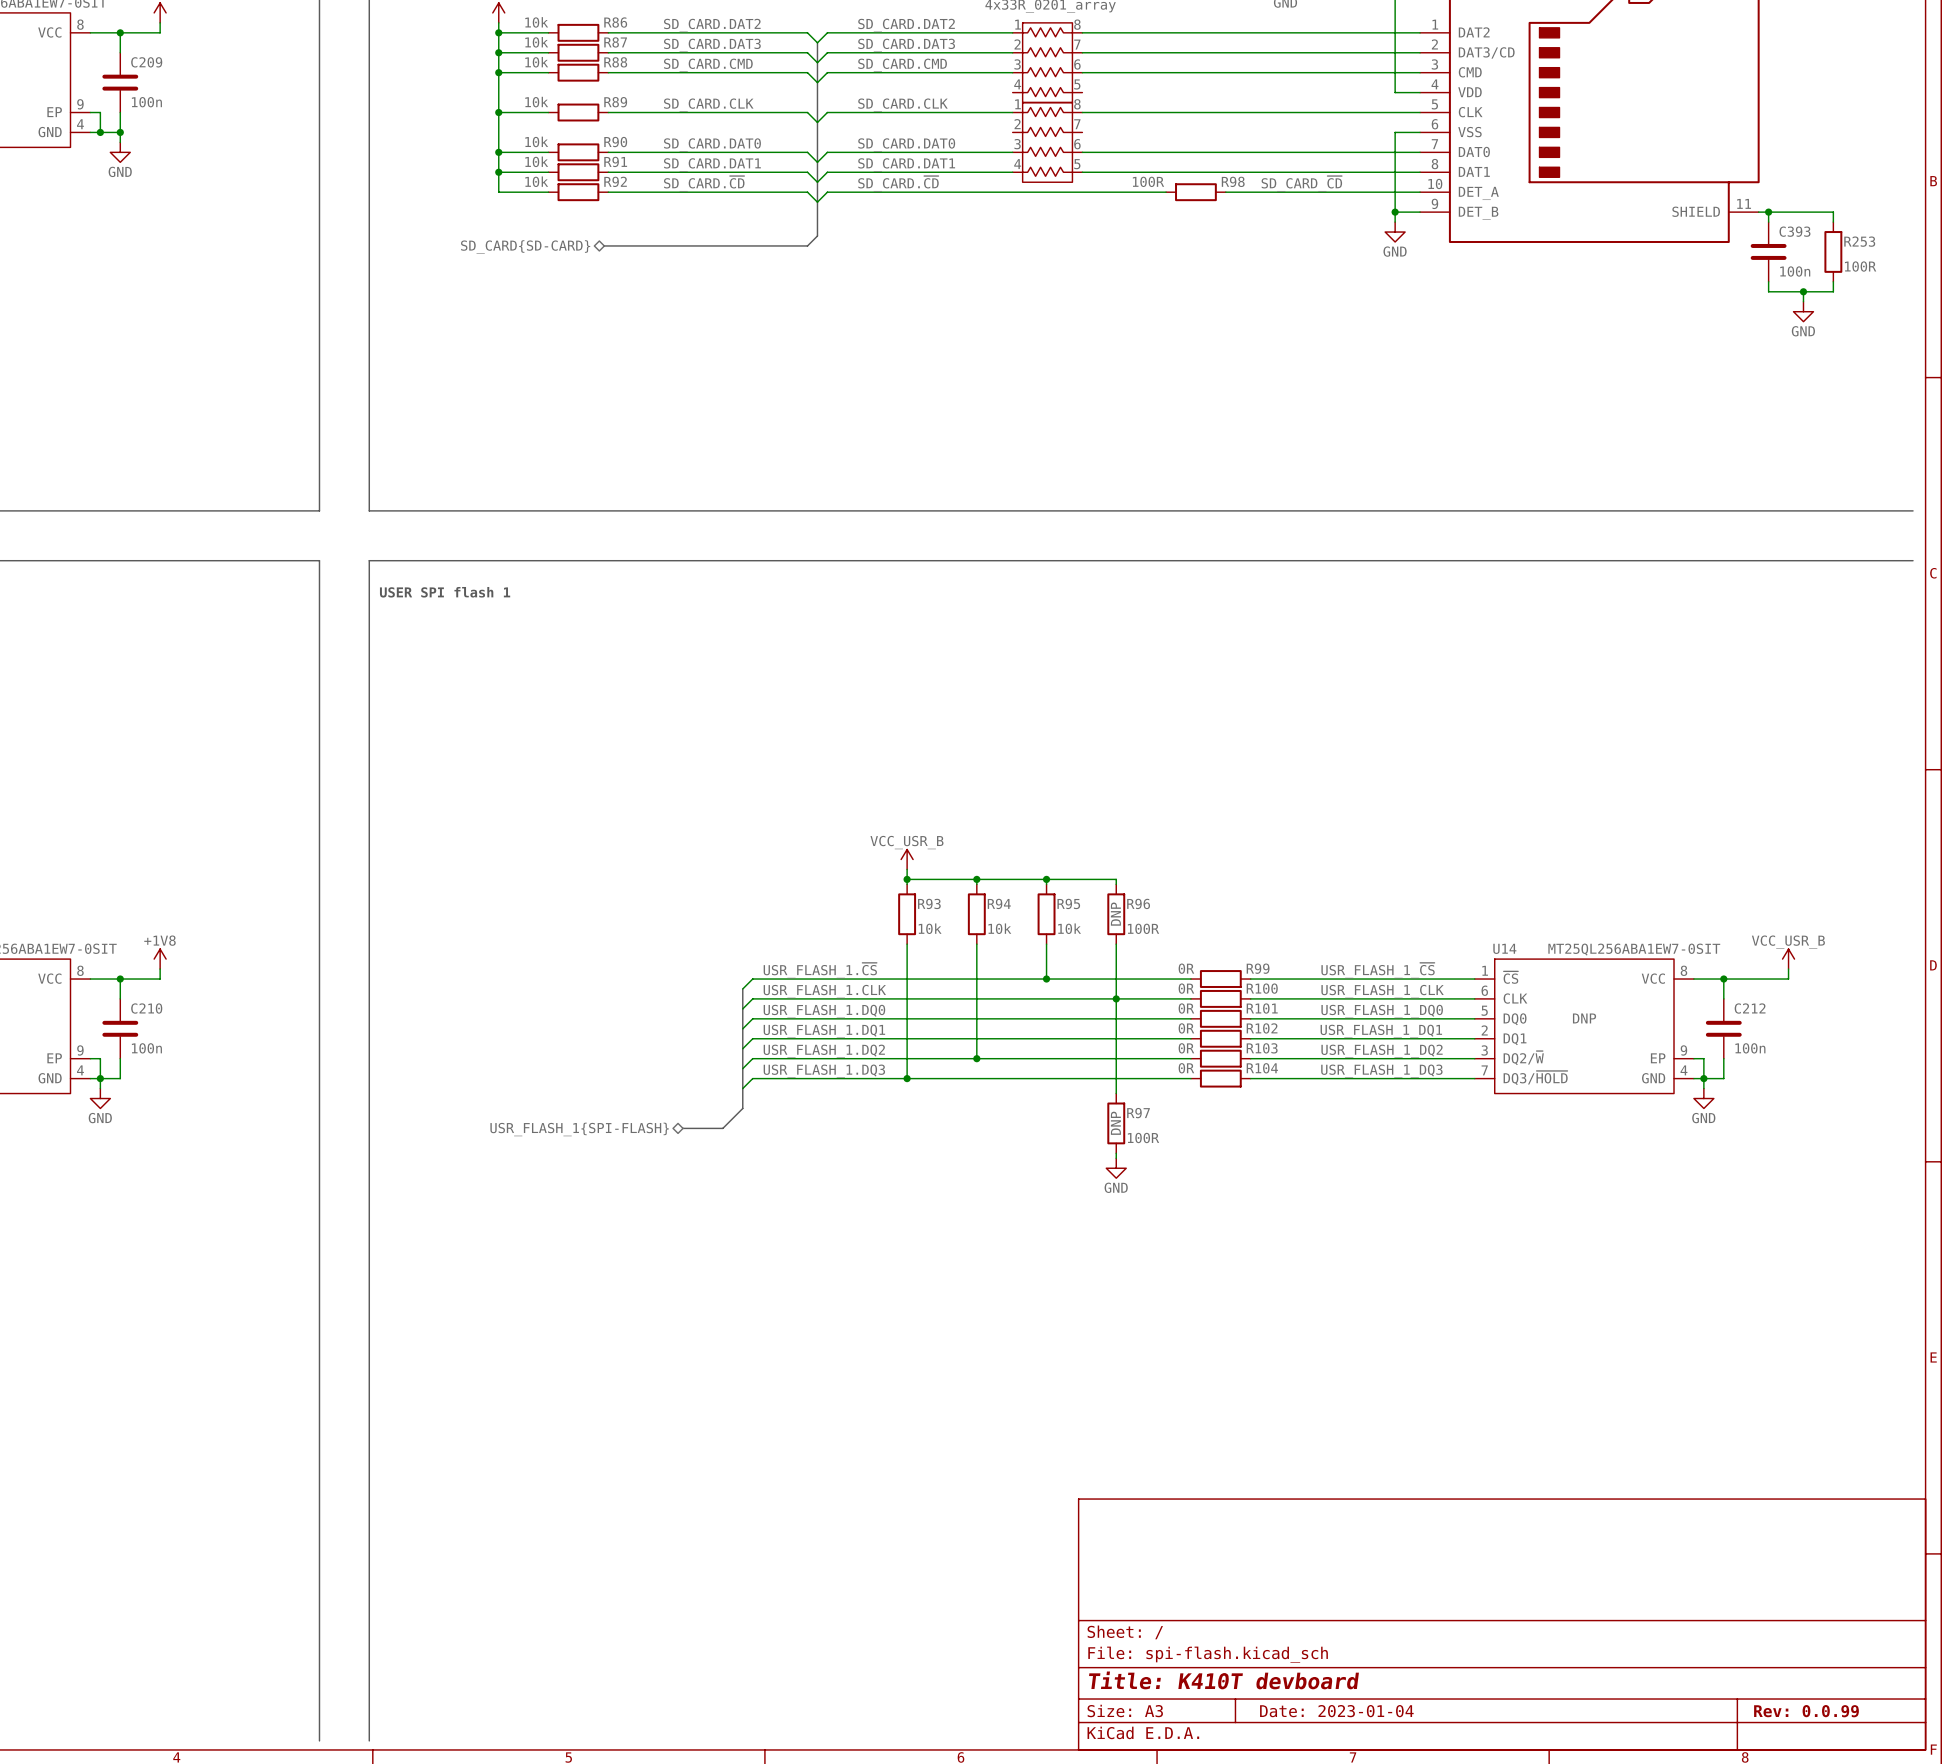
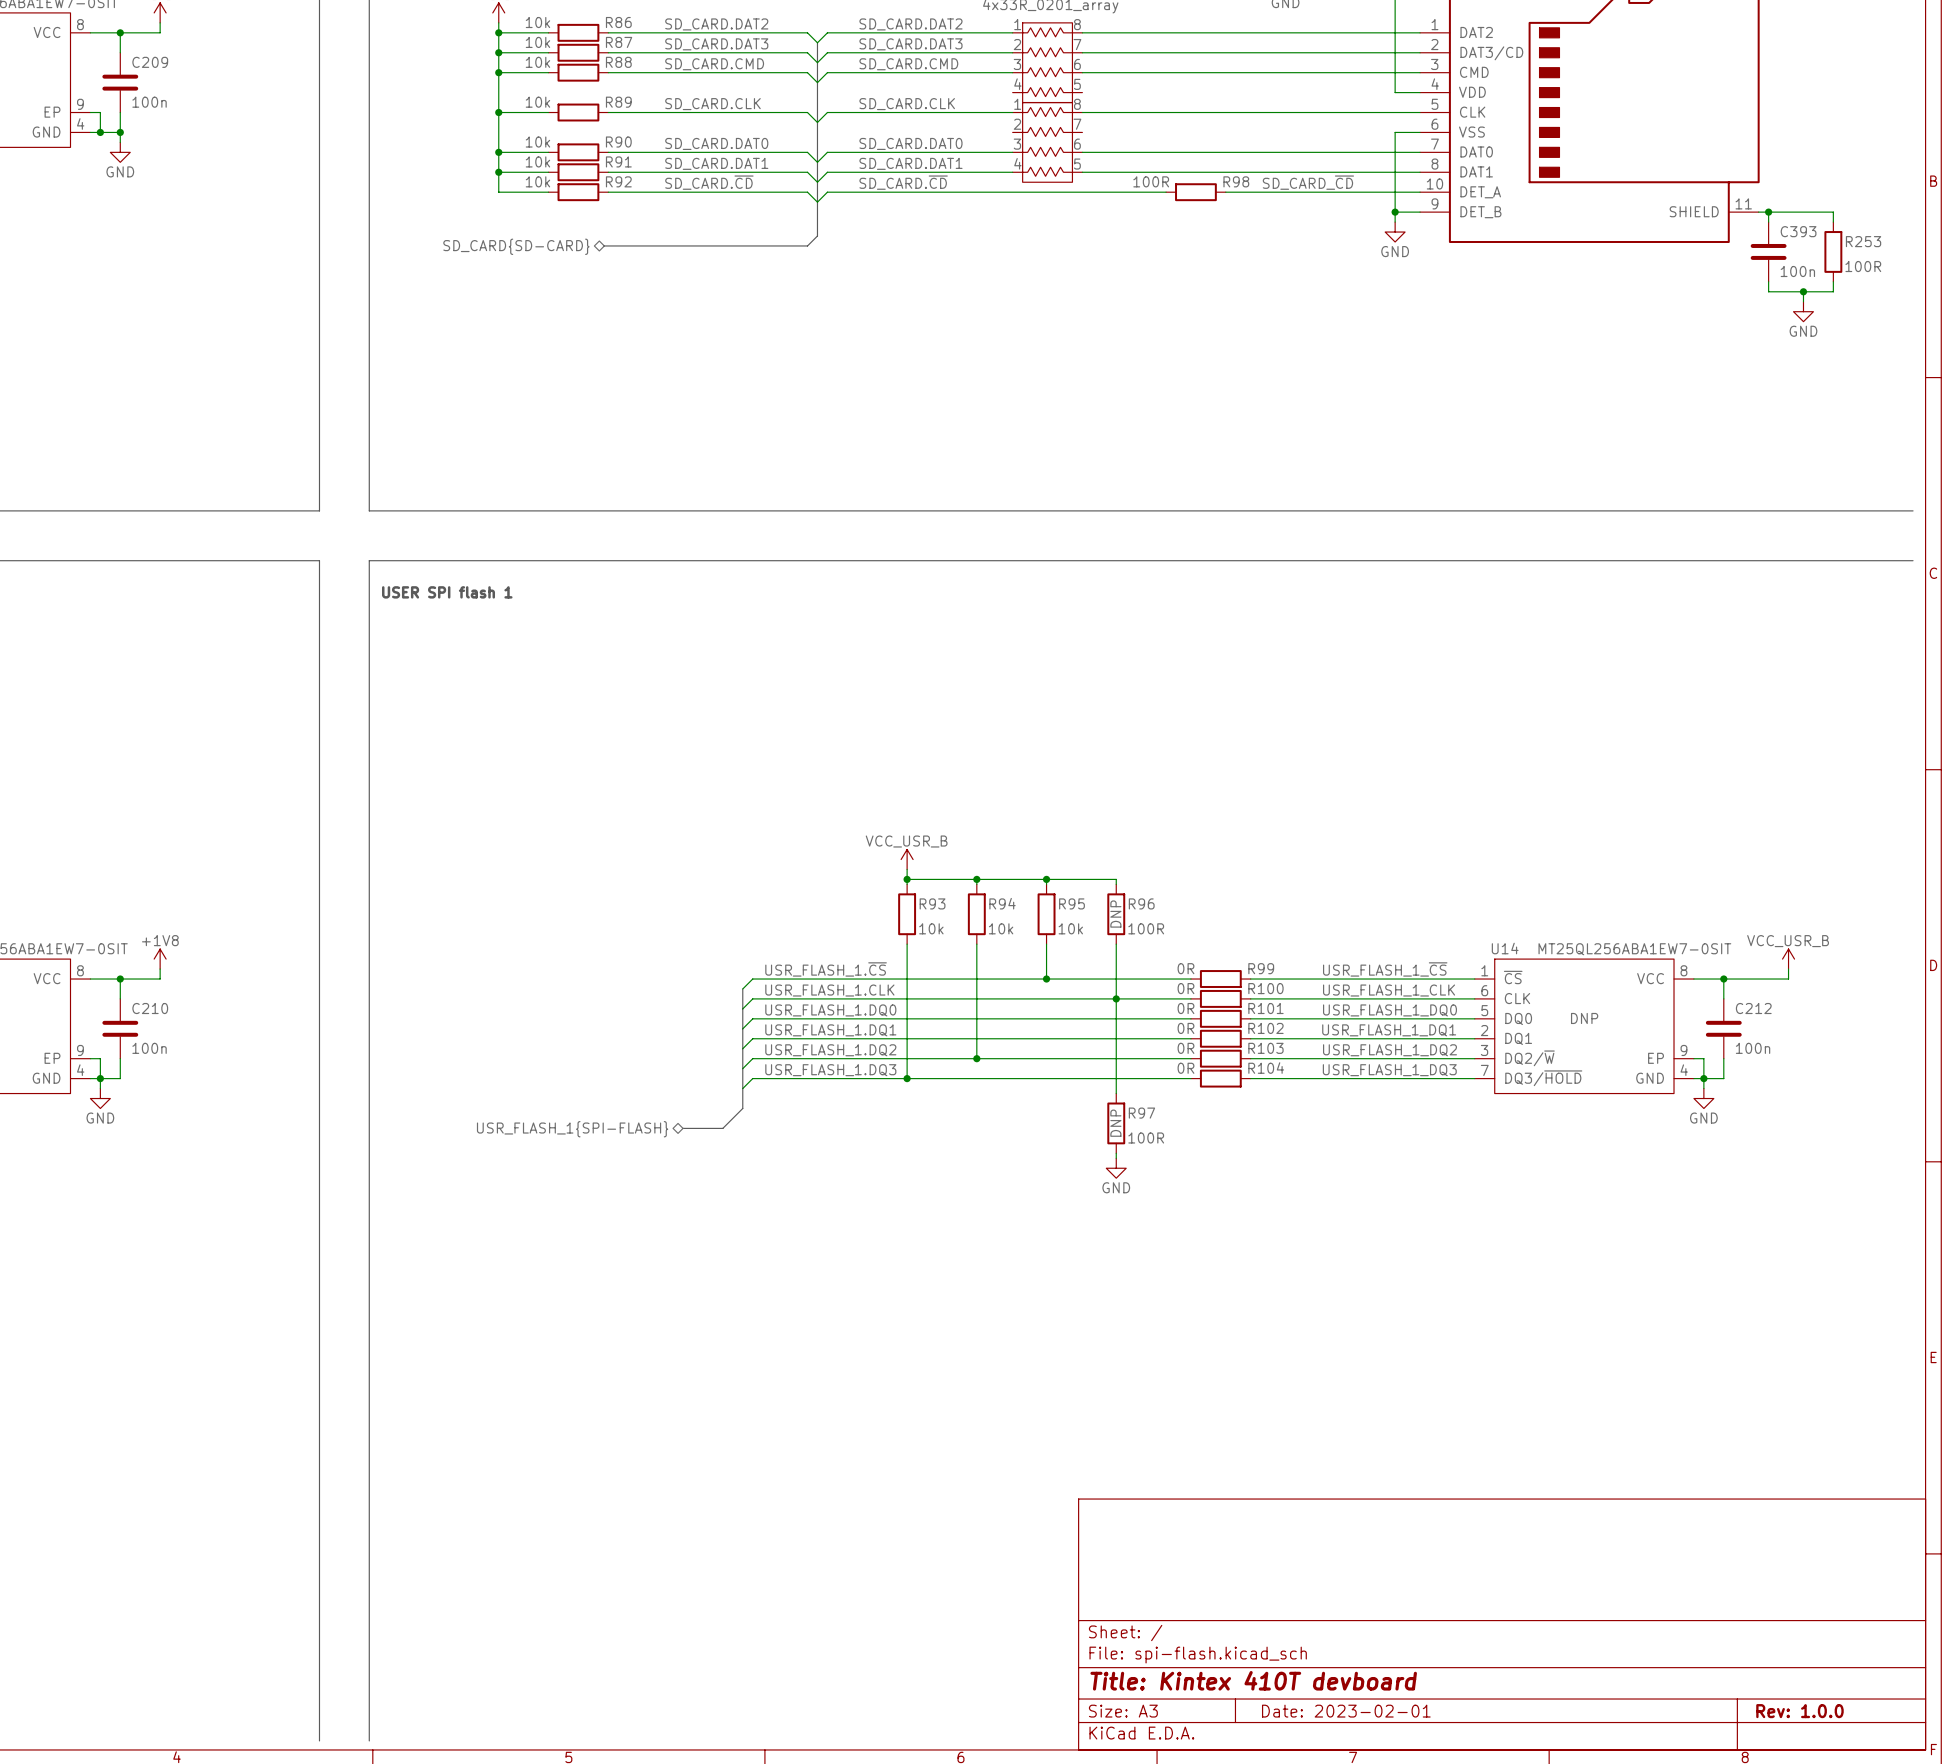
title block: Title: K410T devboard (1223, 1680) -> Title: Kintex 410T devboard (1253, 1680)
title block: Date: 2023-01-04 (1336, 1711) -> Date: 2023-02-01 (1346, 1711)
title block: Rev: 0.0.99 (1806, 1711) -> Rev: 1.0.0 (1799, 1711)

